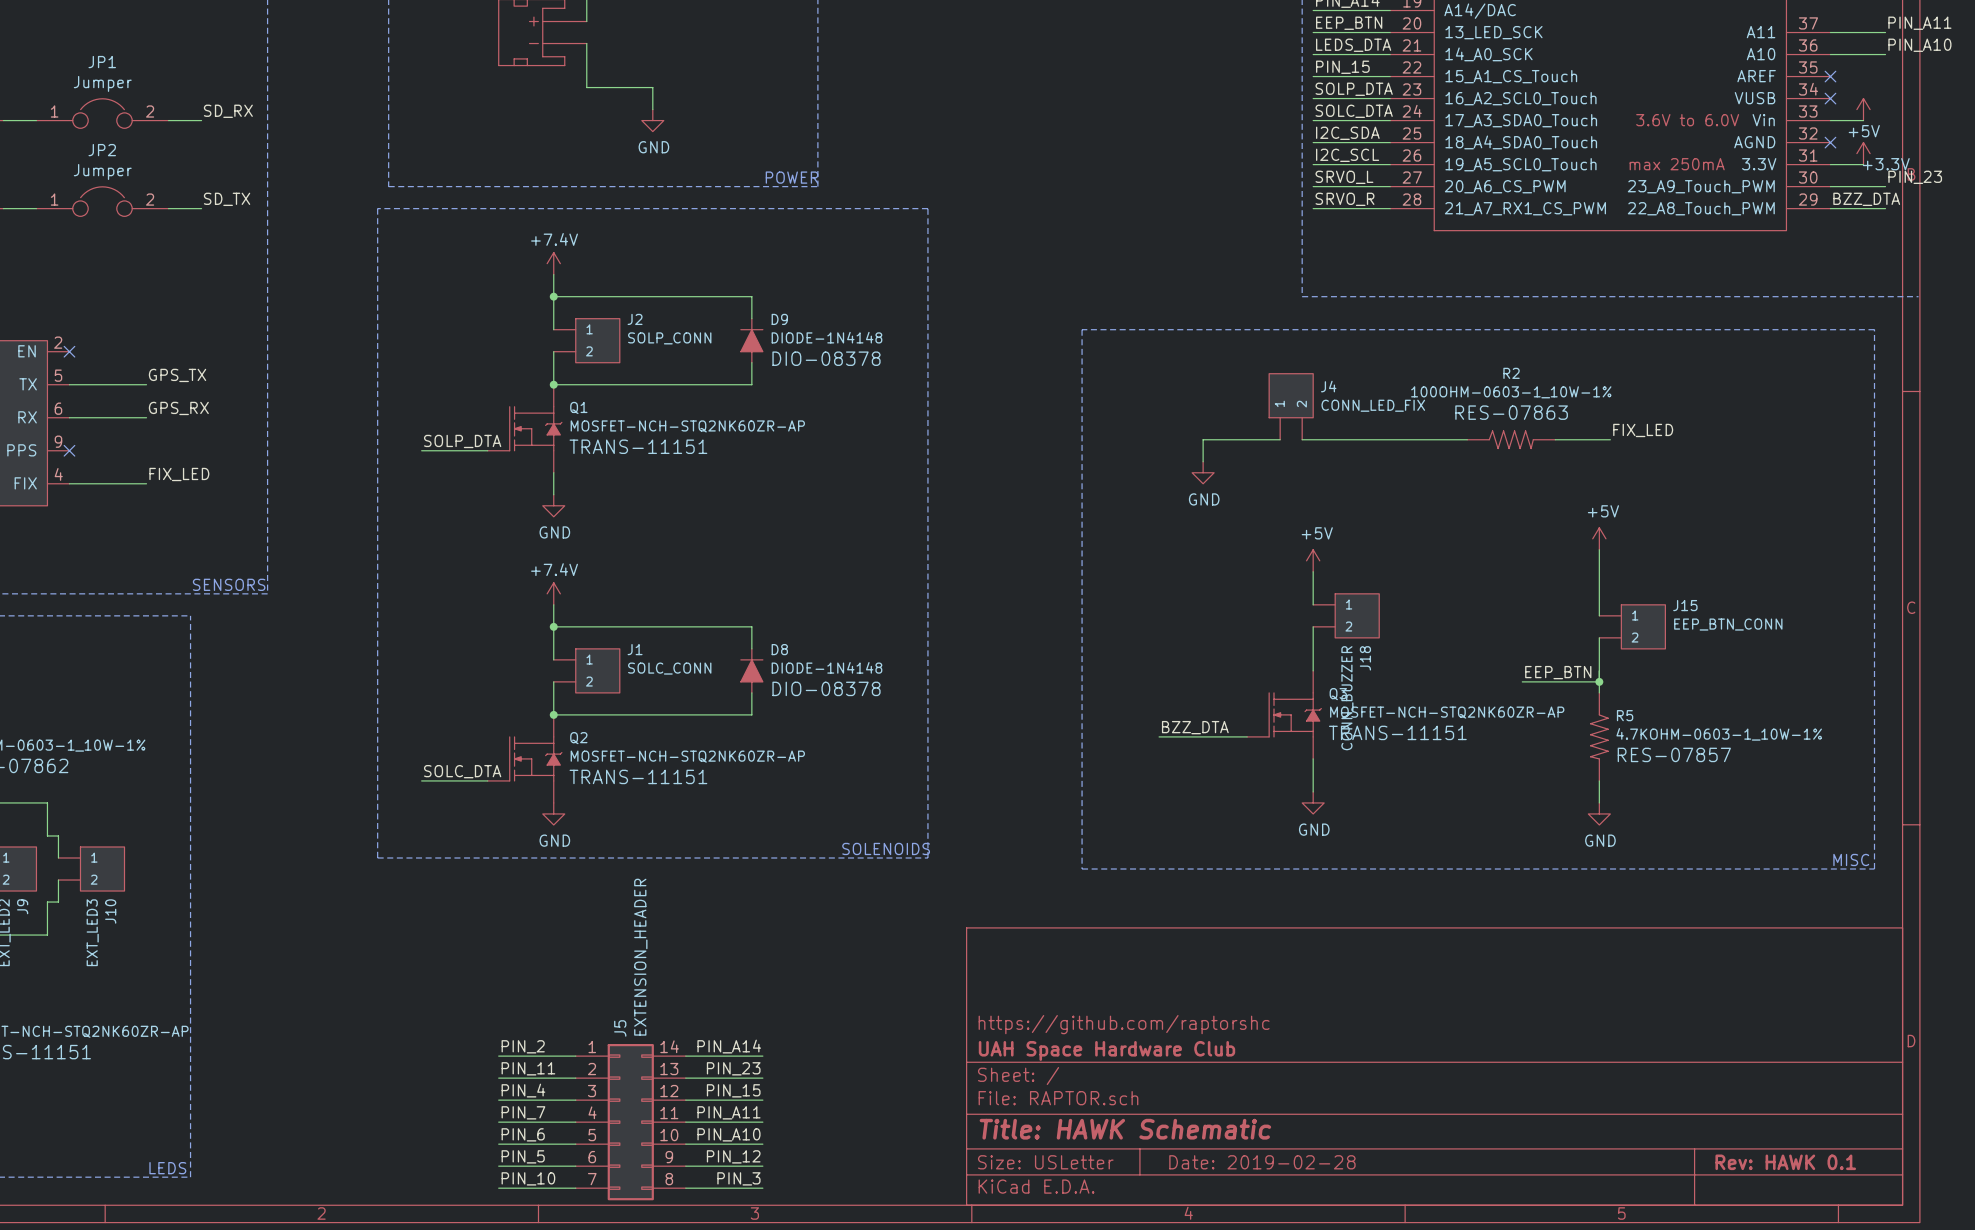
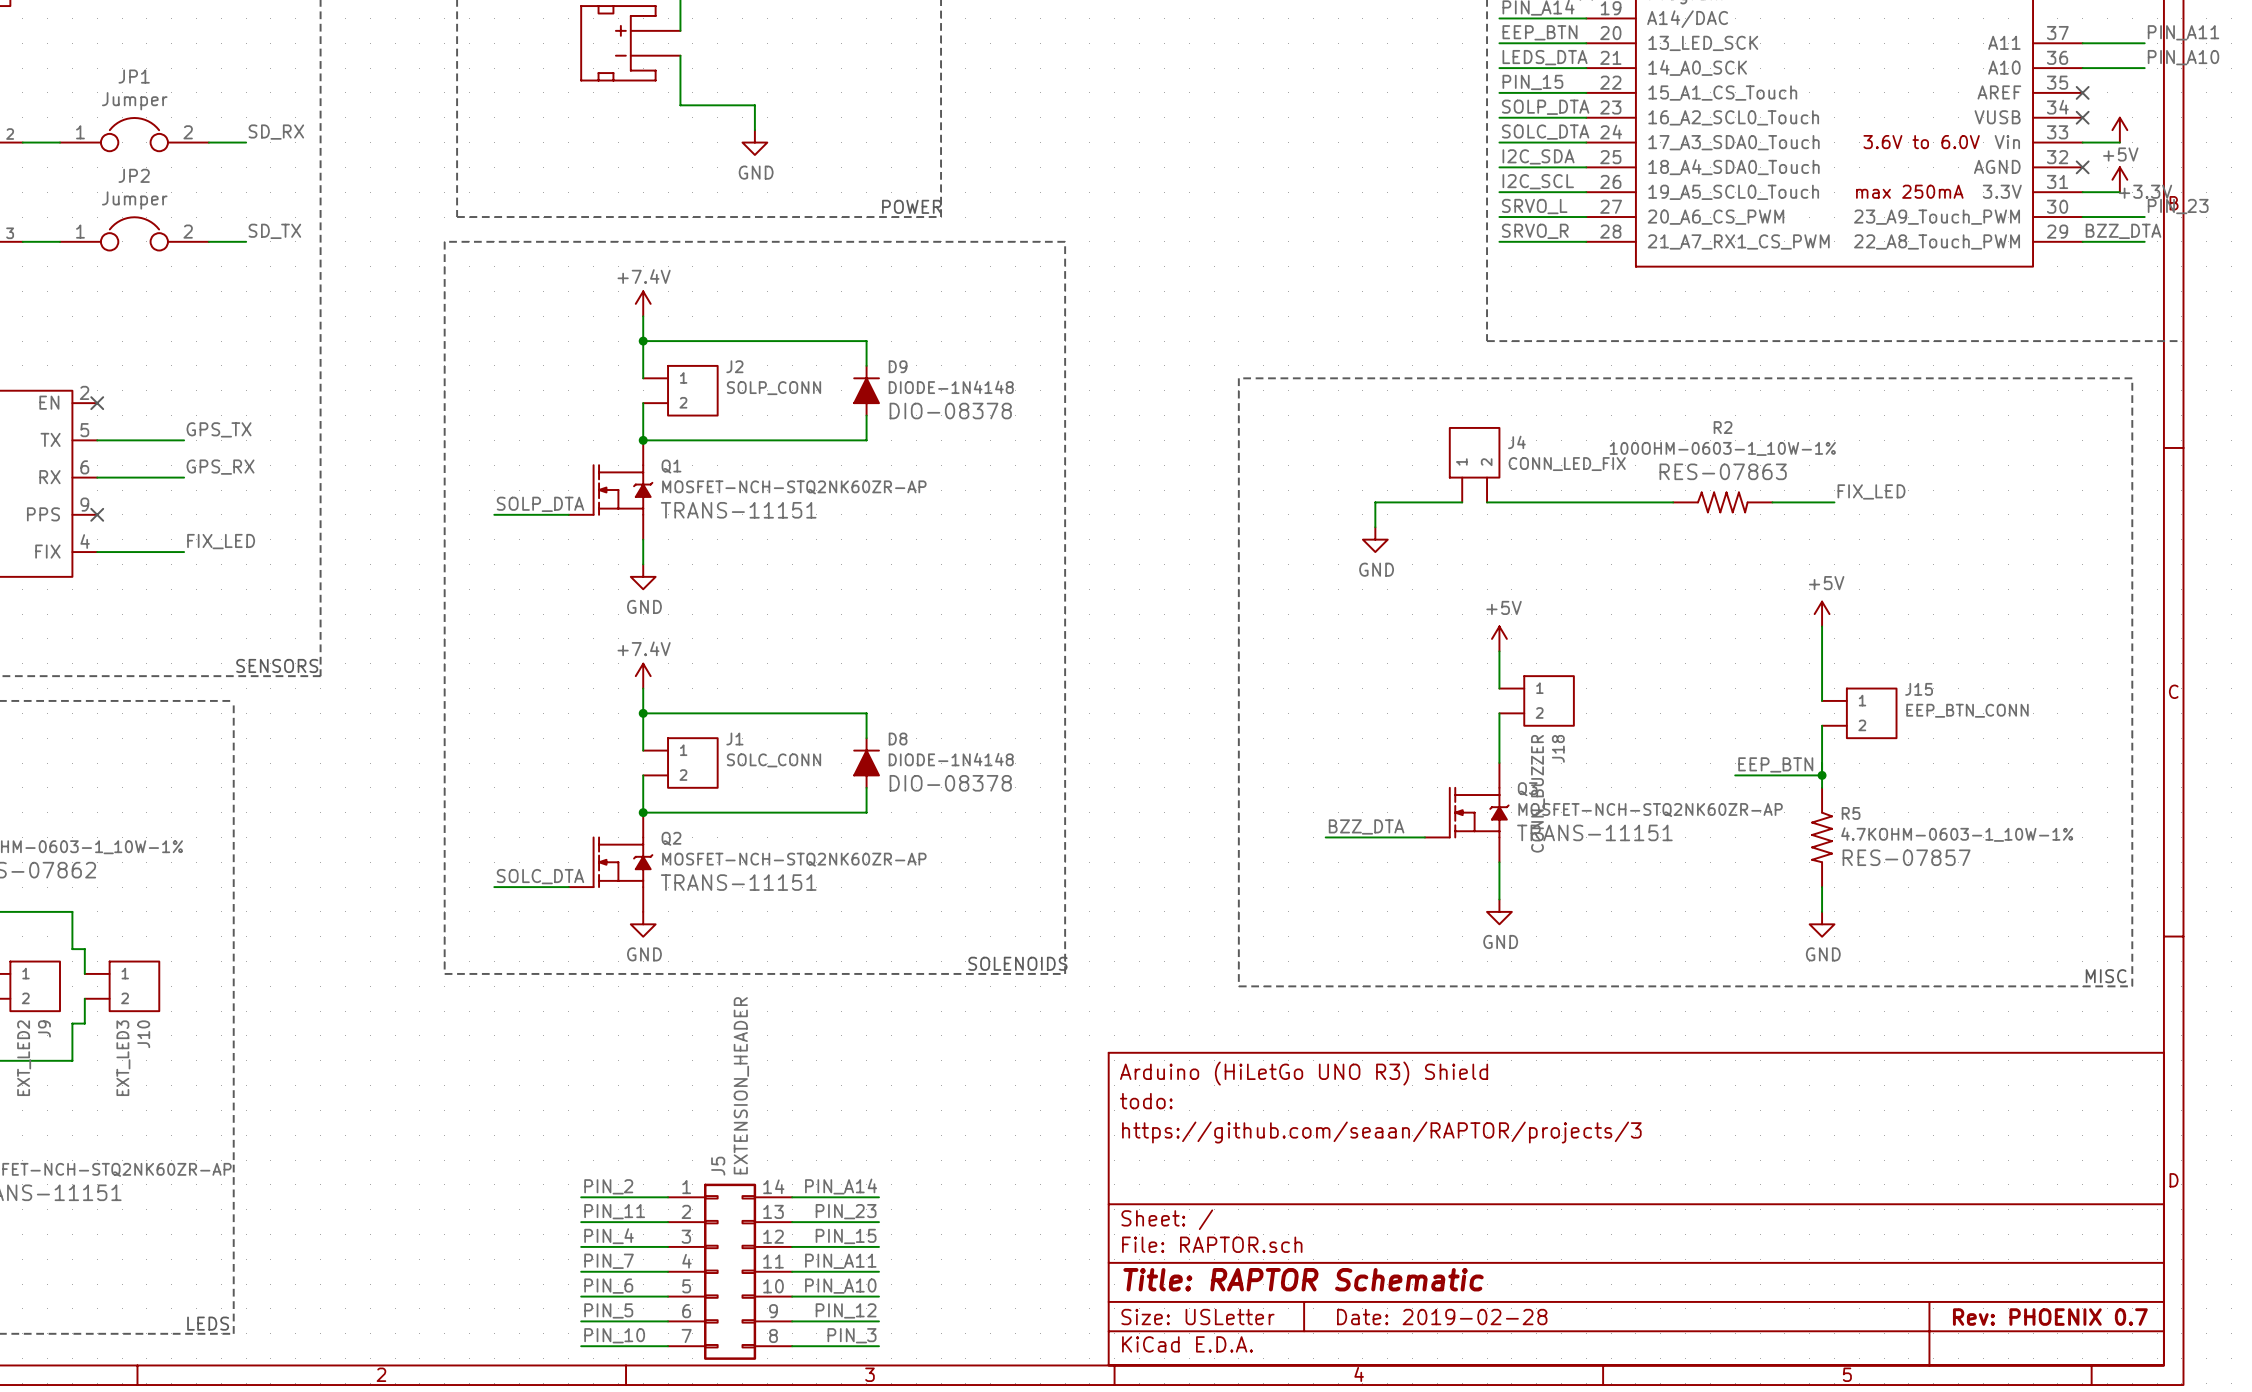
title block: none -> Arduino (HiLetGo UNO R3) Shield (1304, 1073)
title block: none -> todo: (1146, 1101)
title block: https://github.com/raptorshc (1124, 1024) -> https://github.com/seaan/RAPTOR/projects/3 (1381, 1132)
title block: UAH Space Hardware Club (1106, 1050) -> none
title block: Title: HAWK Schematic (1125, 1129) -> Title: RAPTOR Schematic (1303, 1279)
title block: Rev: HAWK 0.1 (1785, 1162) -> Rev: PHOENIX 0.7 (2050, 1317)

